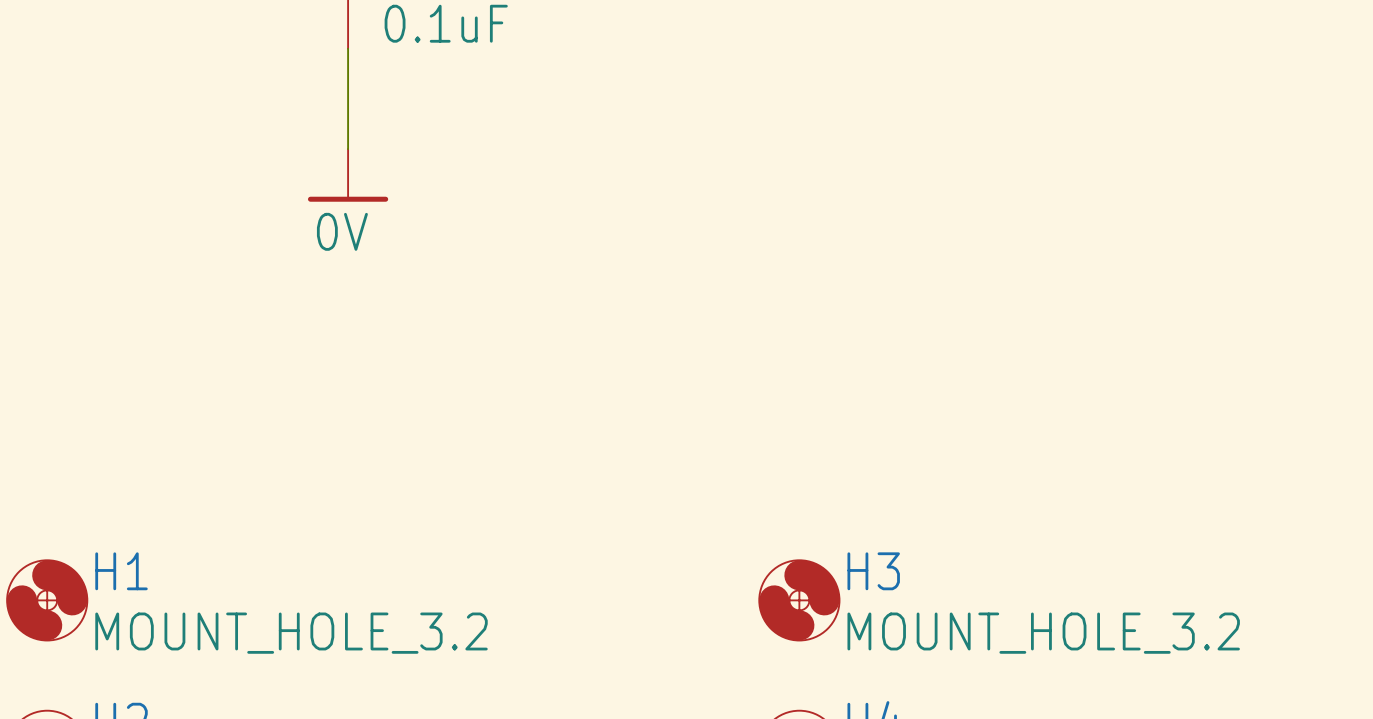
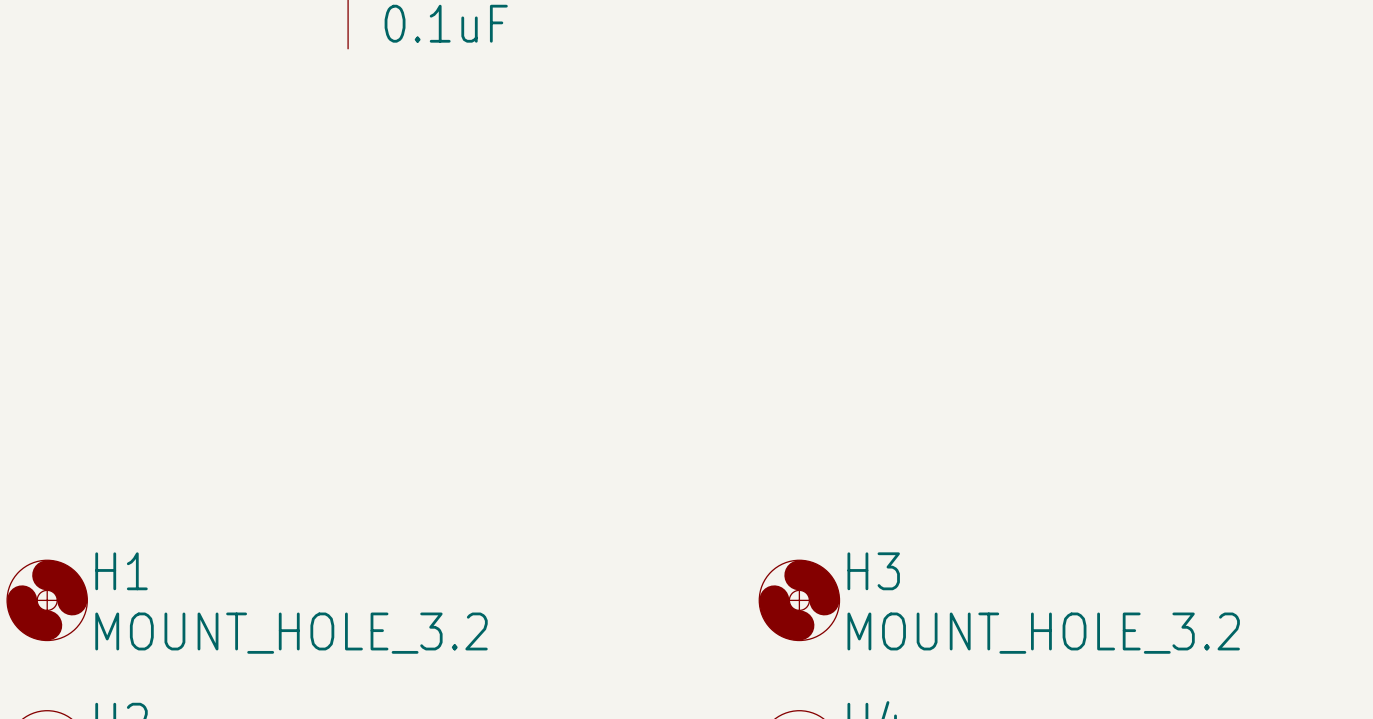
wire: (348, 48) (348, 149) -> none
power symbol: 0V (348, 175) -> none

